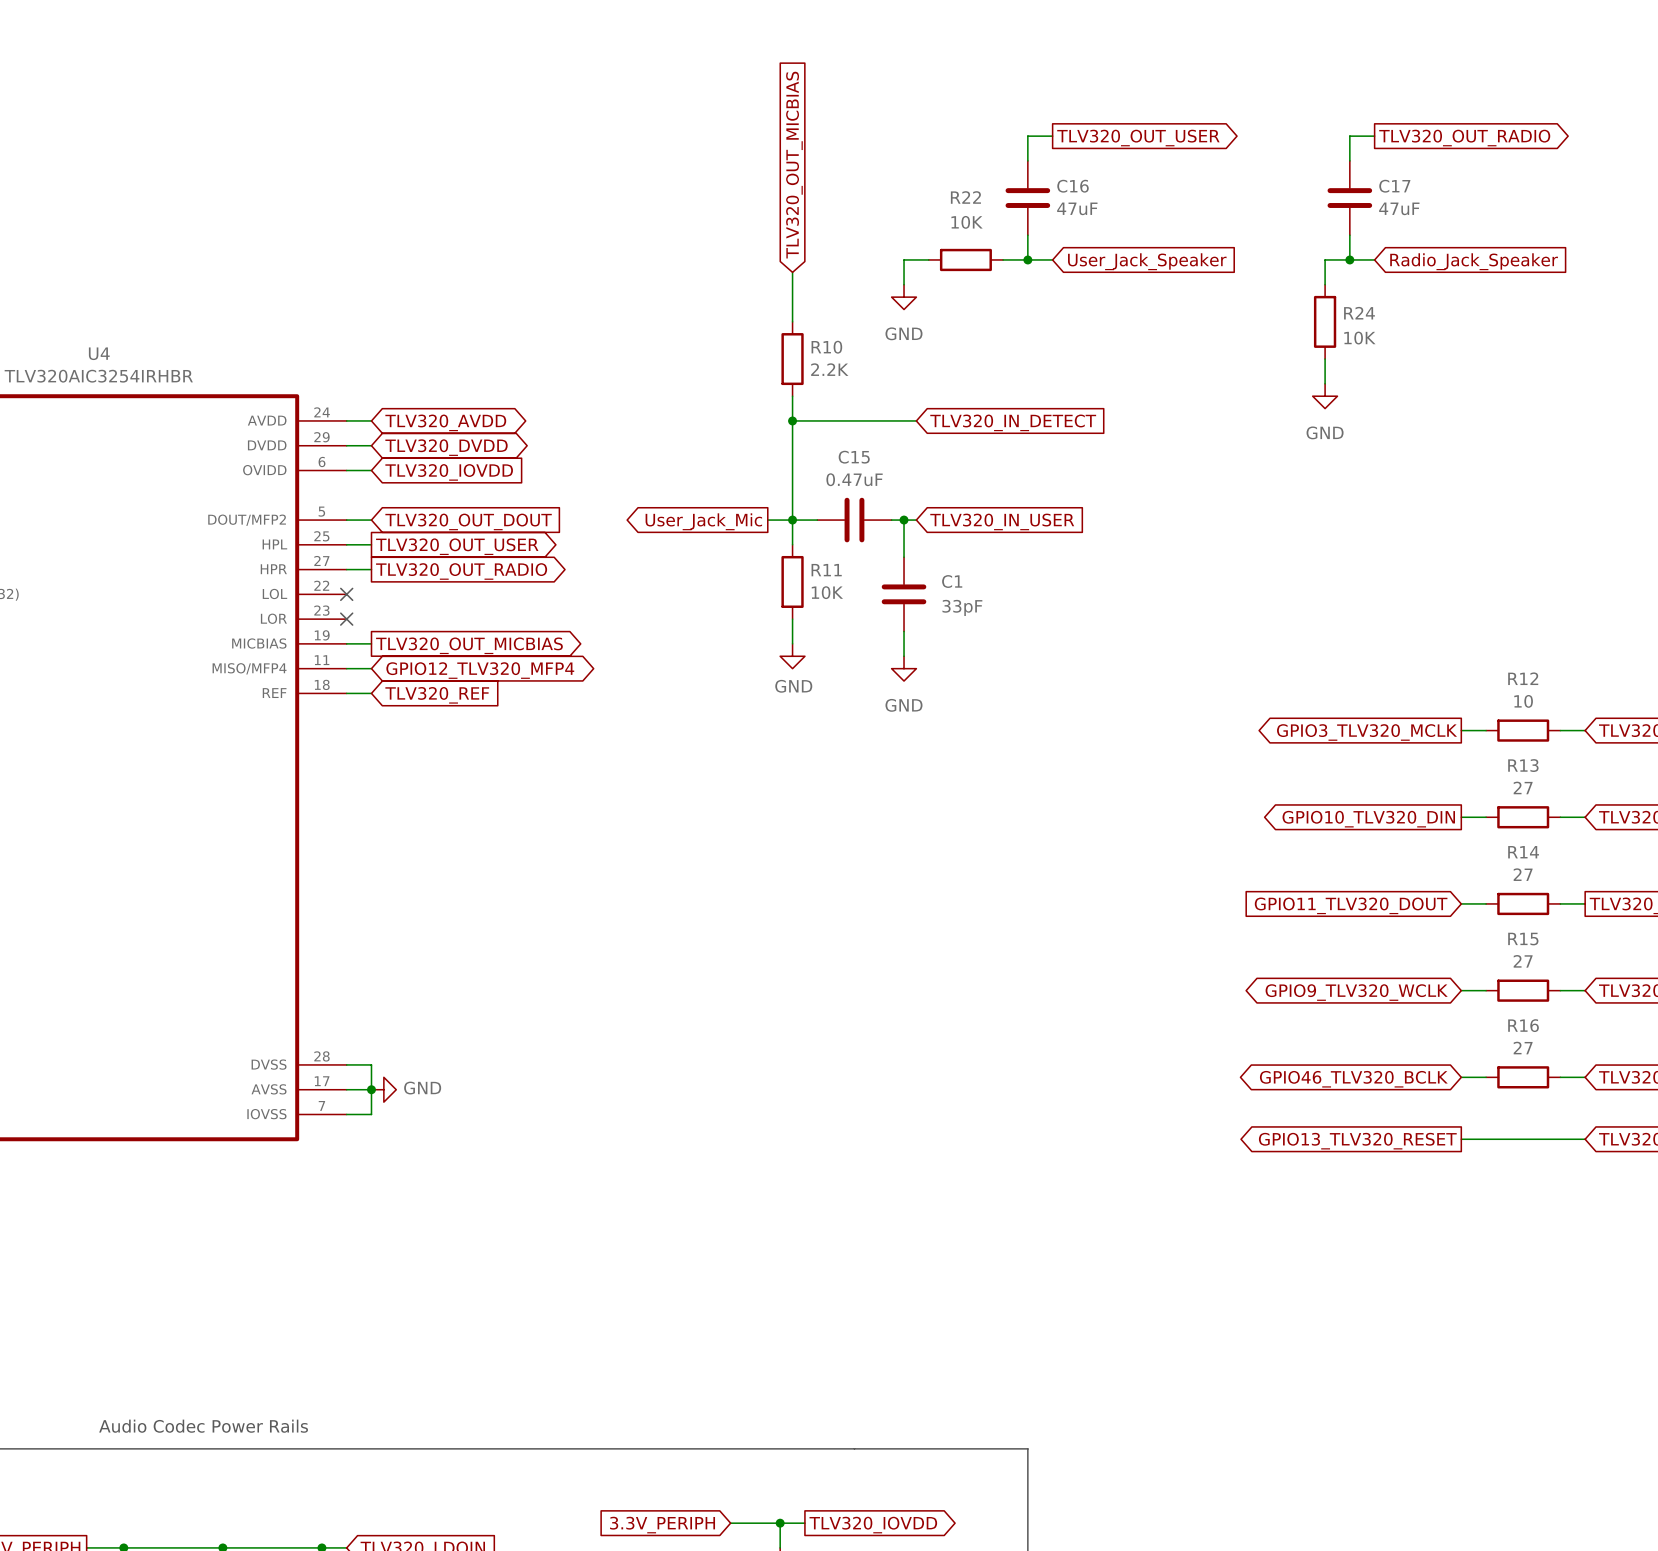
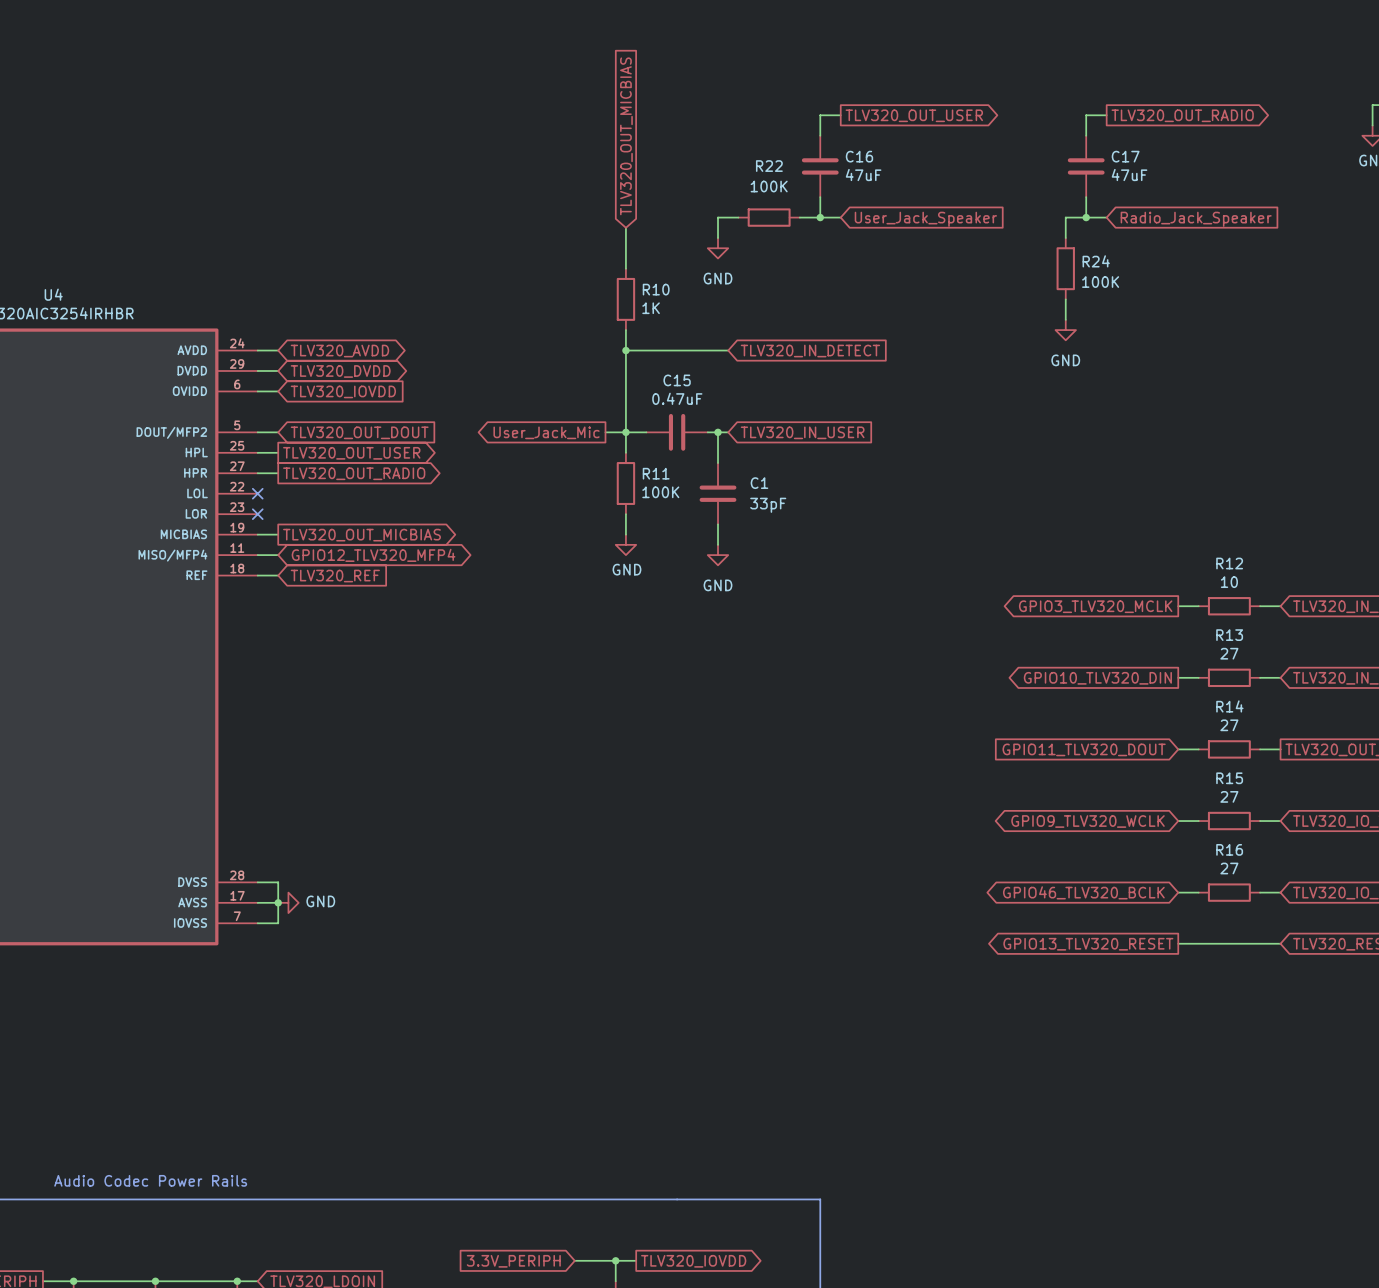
R22 value: 10K (967, 222) -> 100K (769, 186)
R24 value: 10K (1359, 338) -> 100K (1100, 282)
R10 value: 2.2K (829, 369) -> 1K (651, 308)
R11 value: 10K (827, 592) -> 100K (660, 492)

